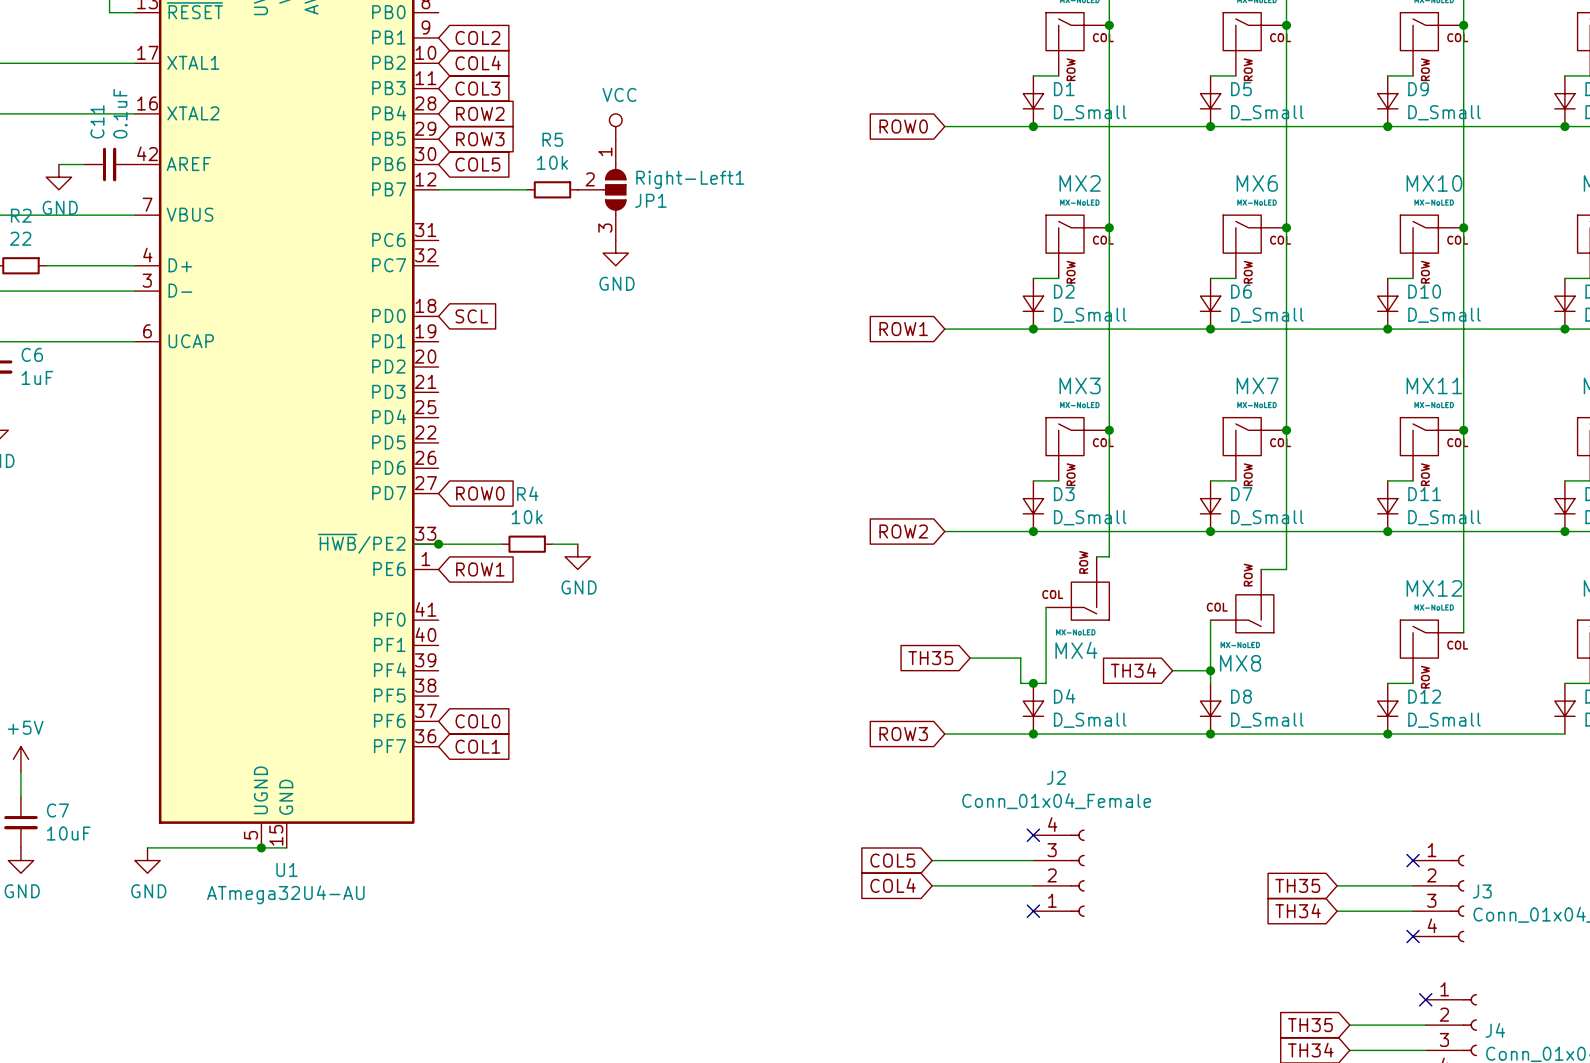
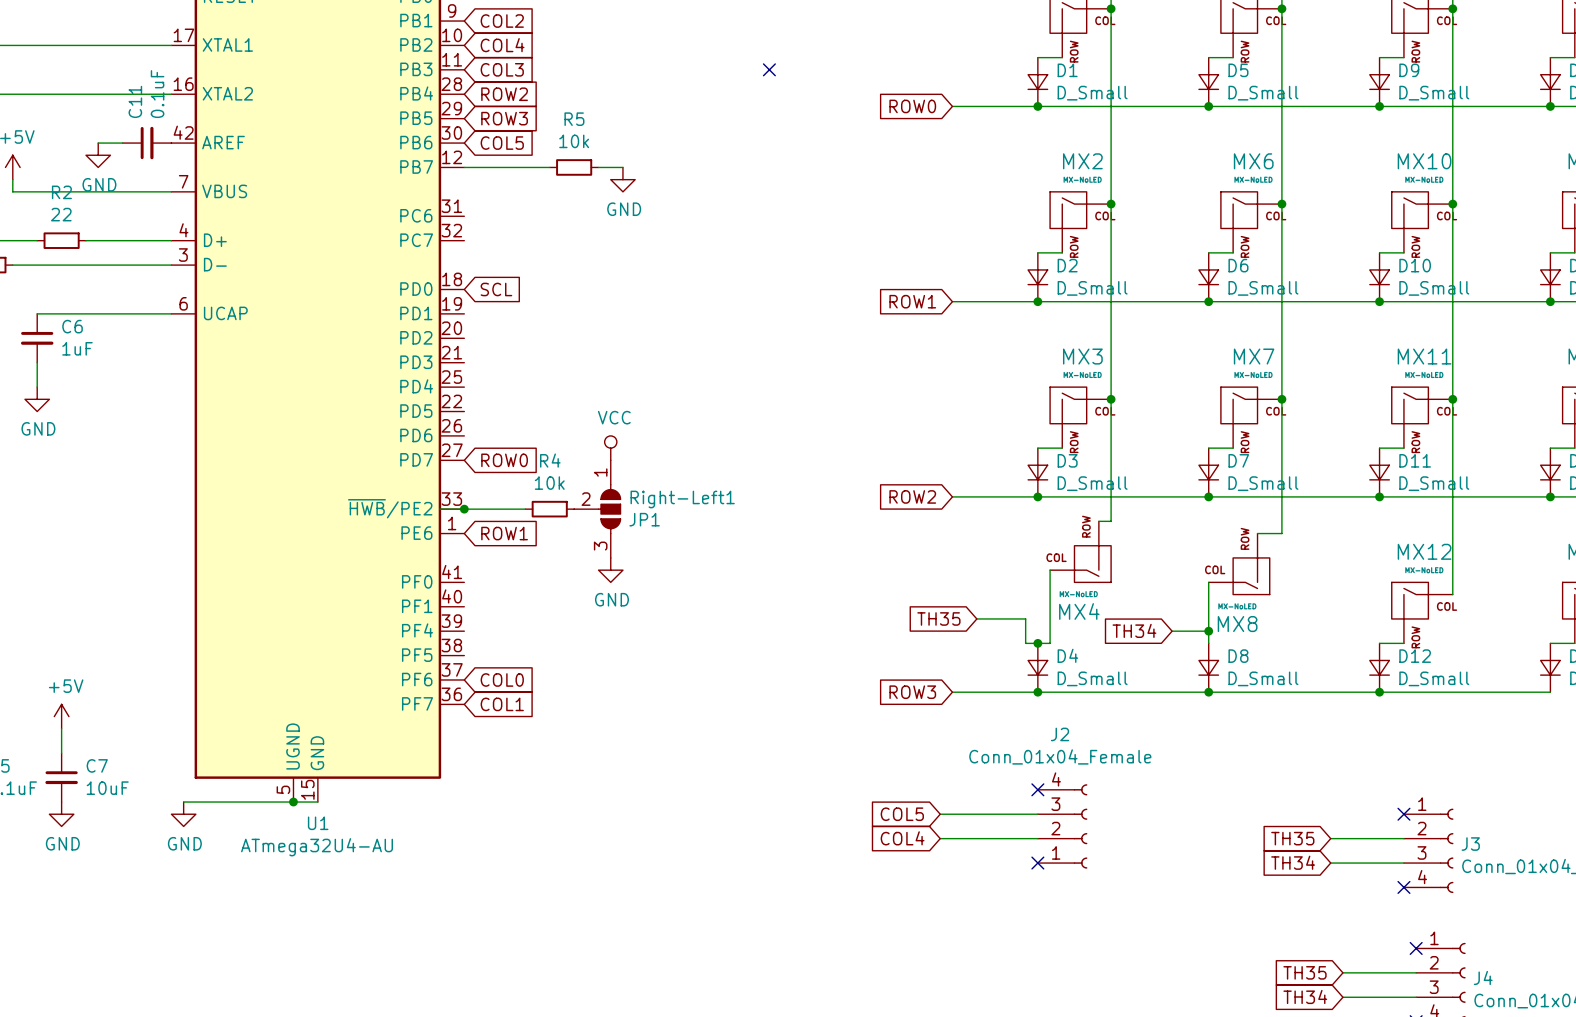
no-connect mark: none -> (769, 69)
power symbol: VCC (615, 126) -> none
Right-Left1 position: (601, 189) -> (597, 509)
power symbol position: GND (615, 253) -> GND (622, 179)
power symbol: none -> VCC (610, 448)
power symbol position: GND (577, 556) -> GND (610, 570)

